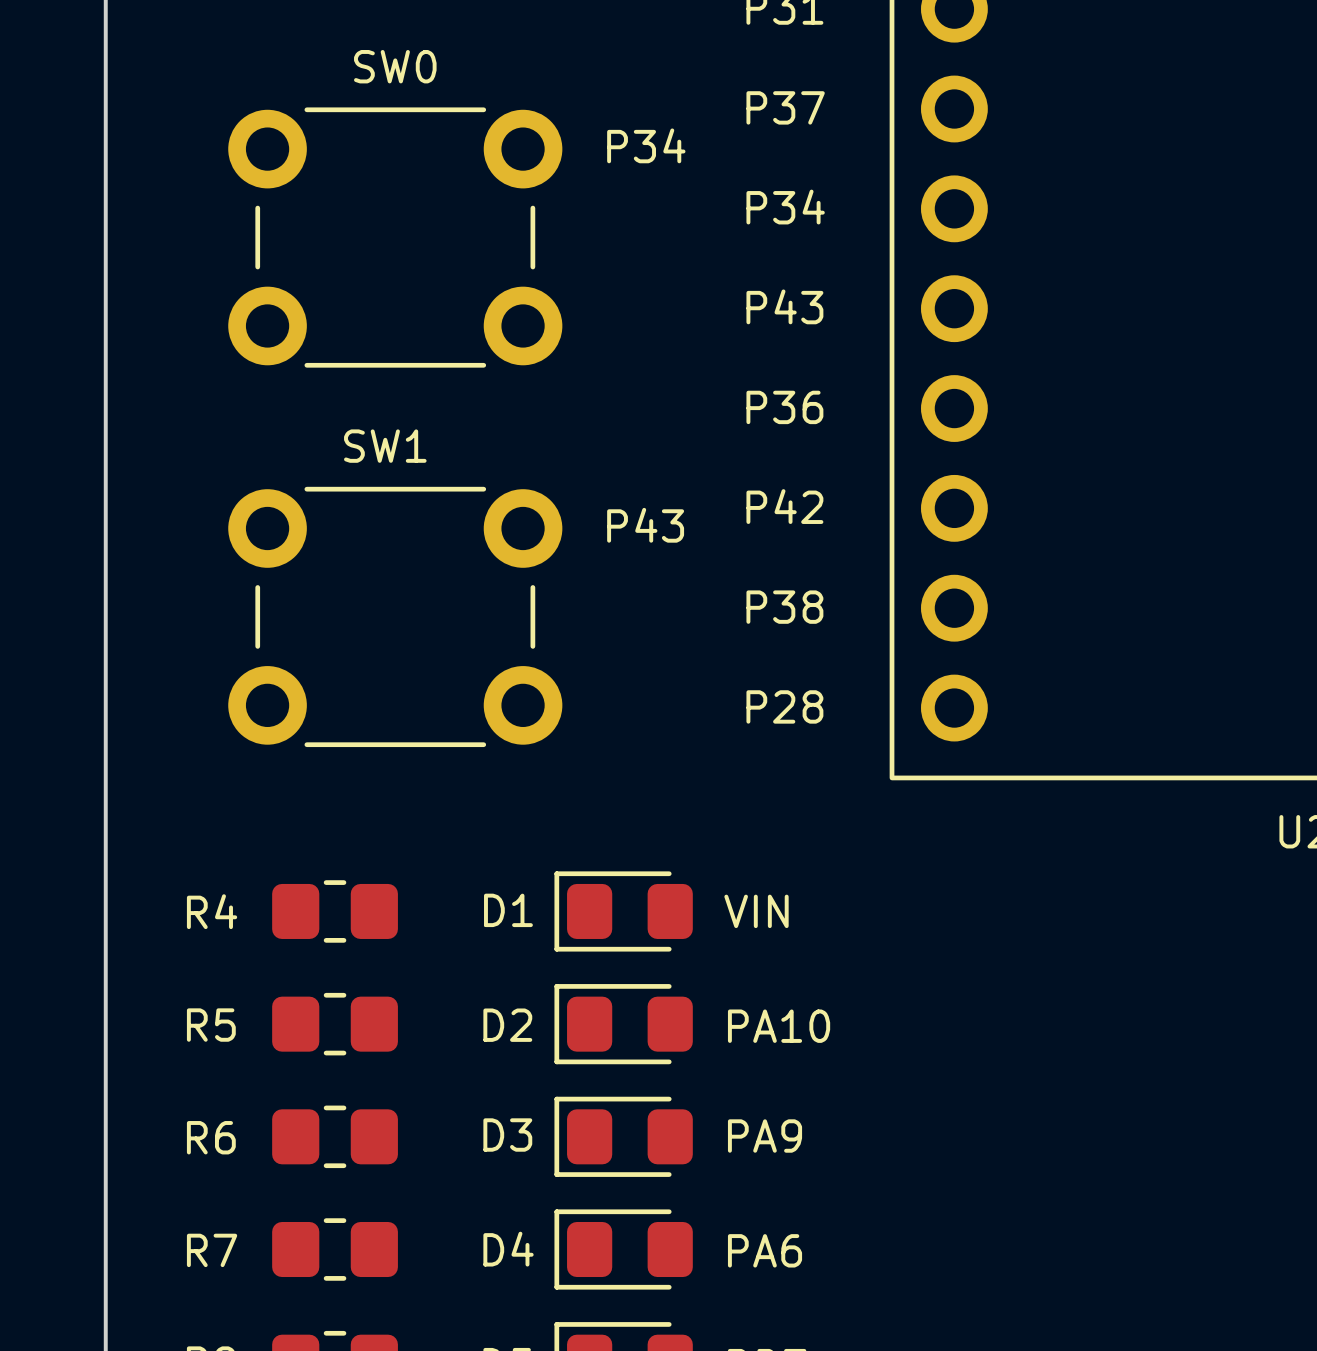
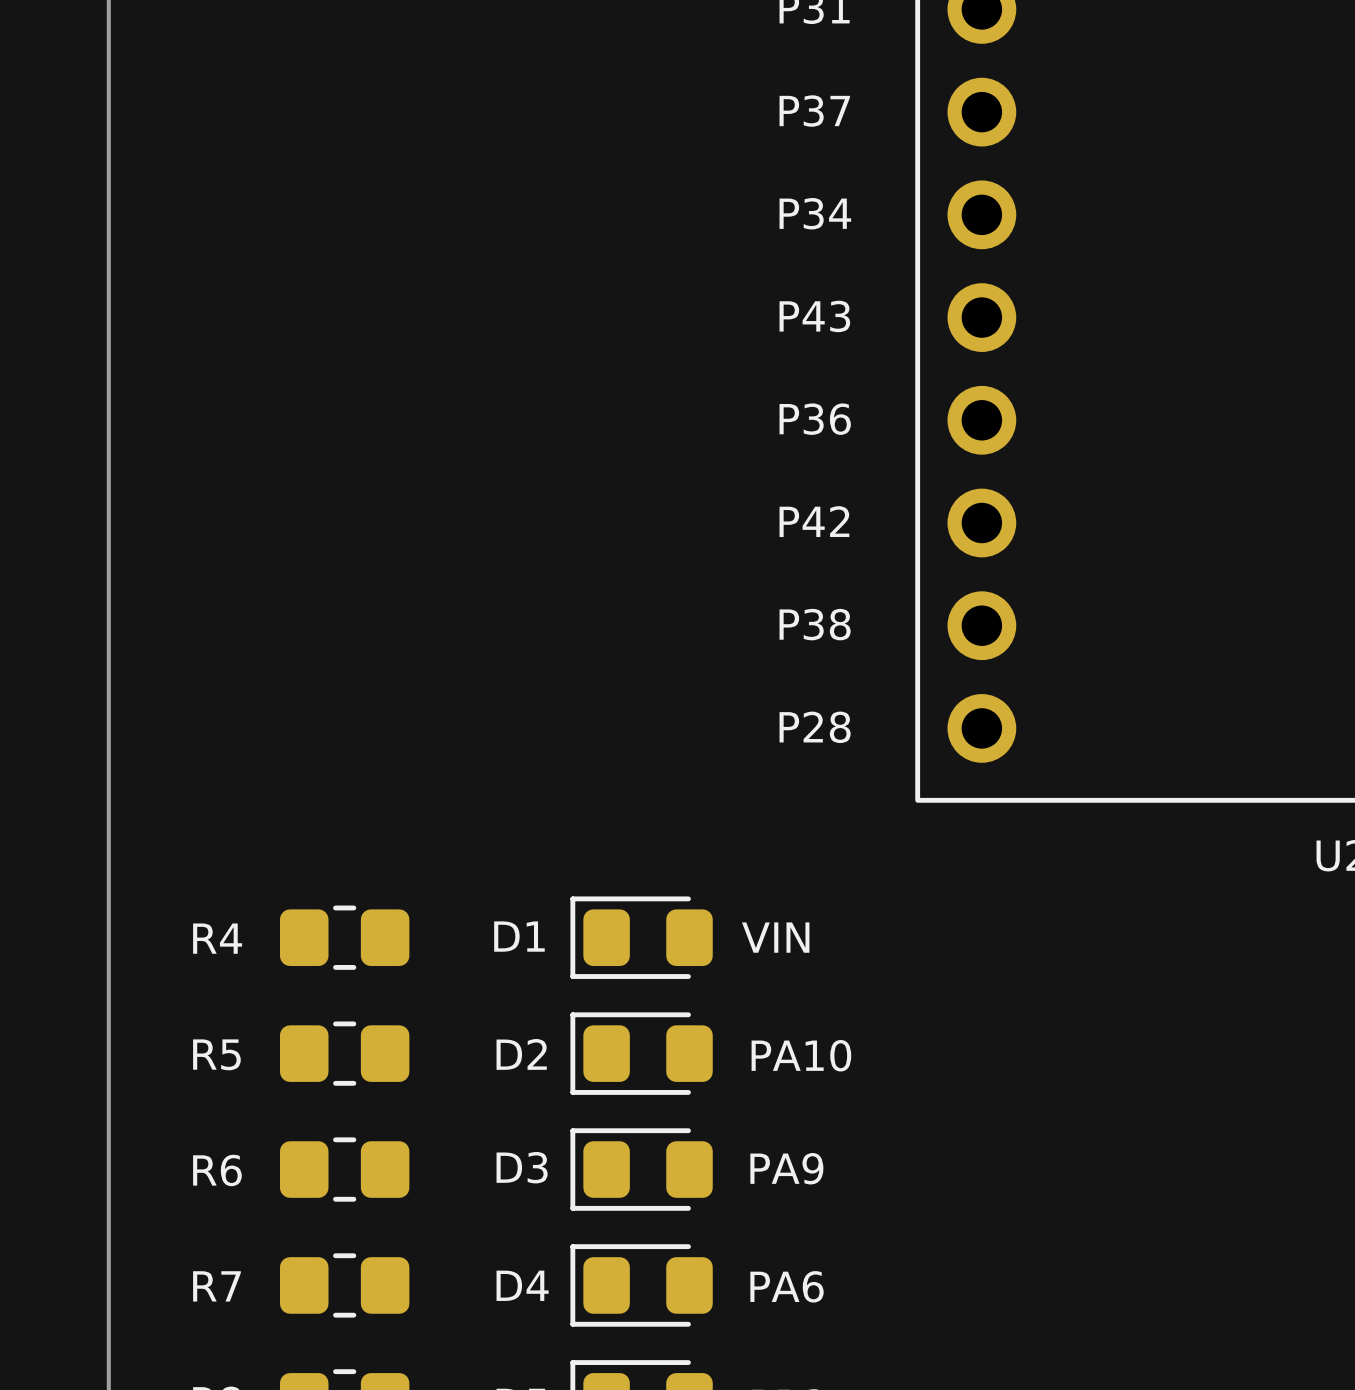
text: P34 (646, 145) -> none
SW0: (395, 237) -> none
text: P43 (645, 525) -> none
SW1: (395, 616) -> none

